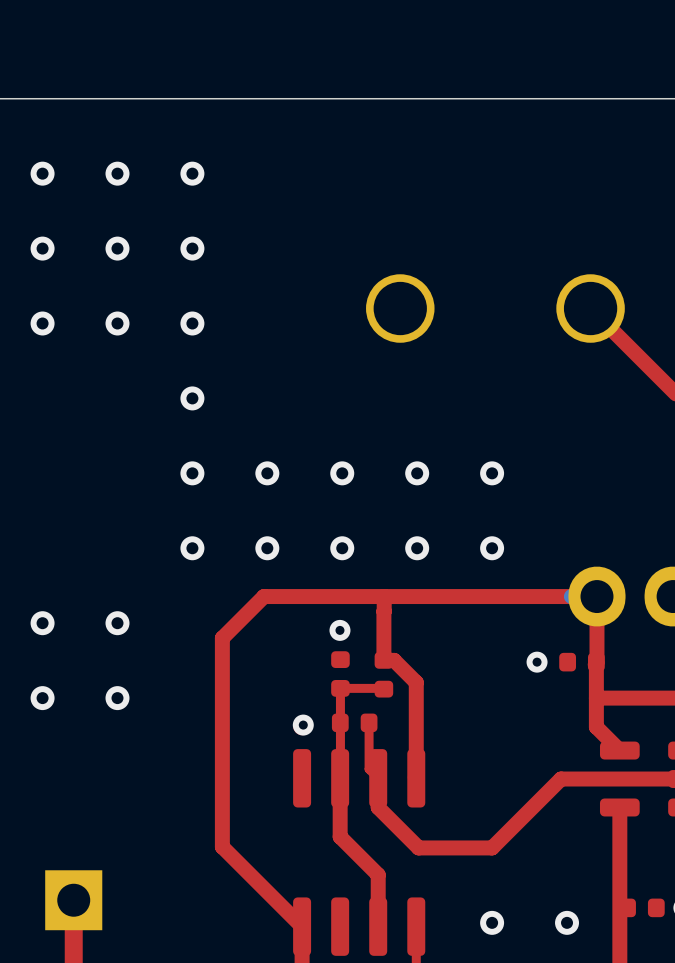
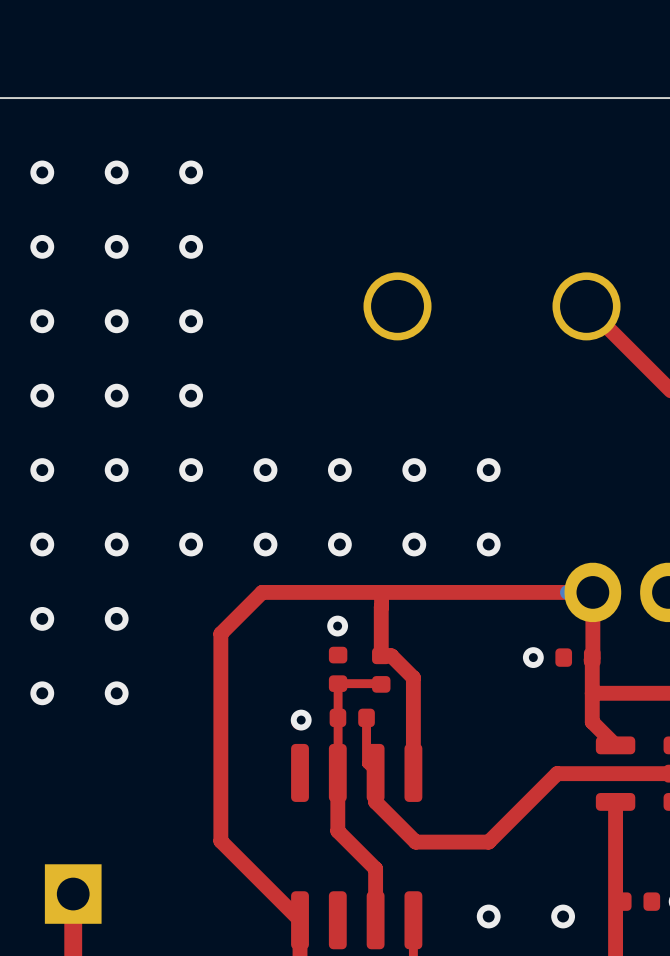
via: none -> (42, 395)
via: none -> (116, 395)
via: none -> (42, 470)
via: none -> (116, 470)
via: none -> (42, 544)
via: none -> (116, 544)

